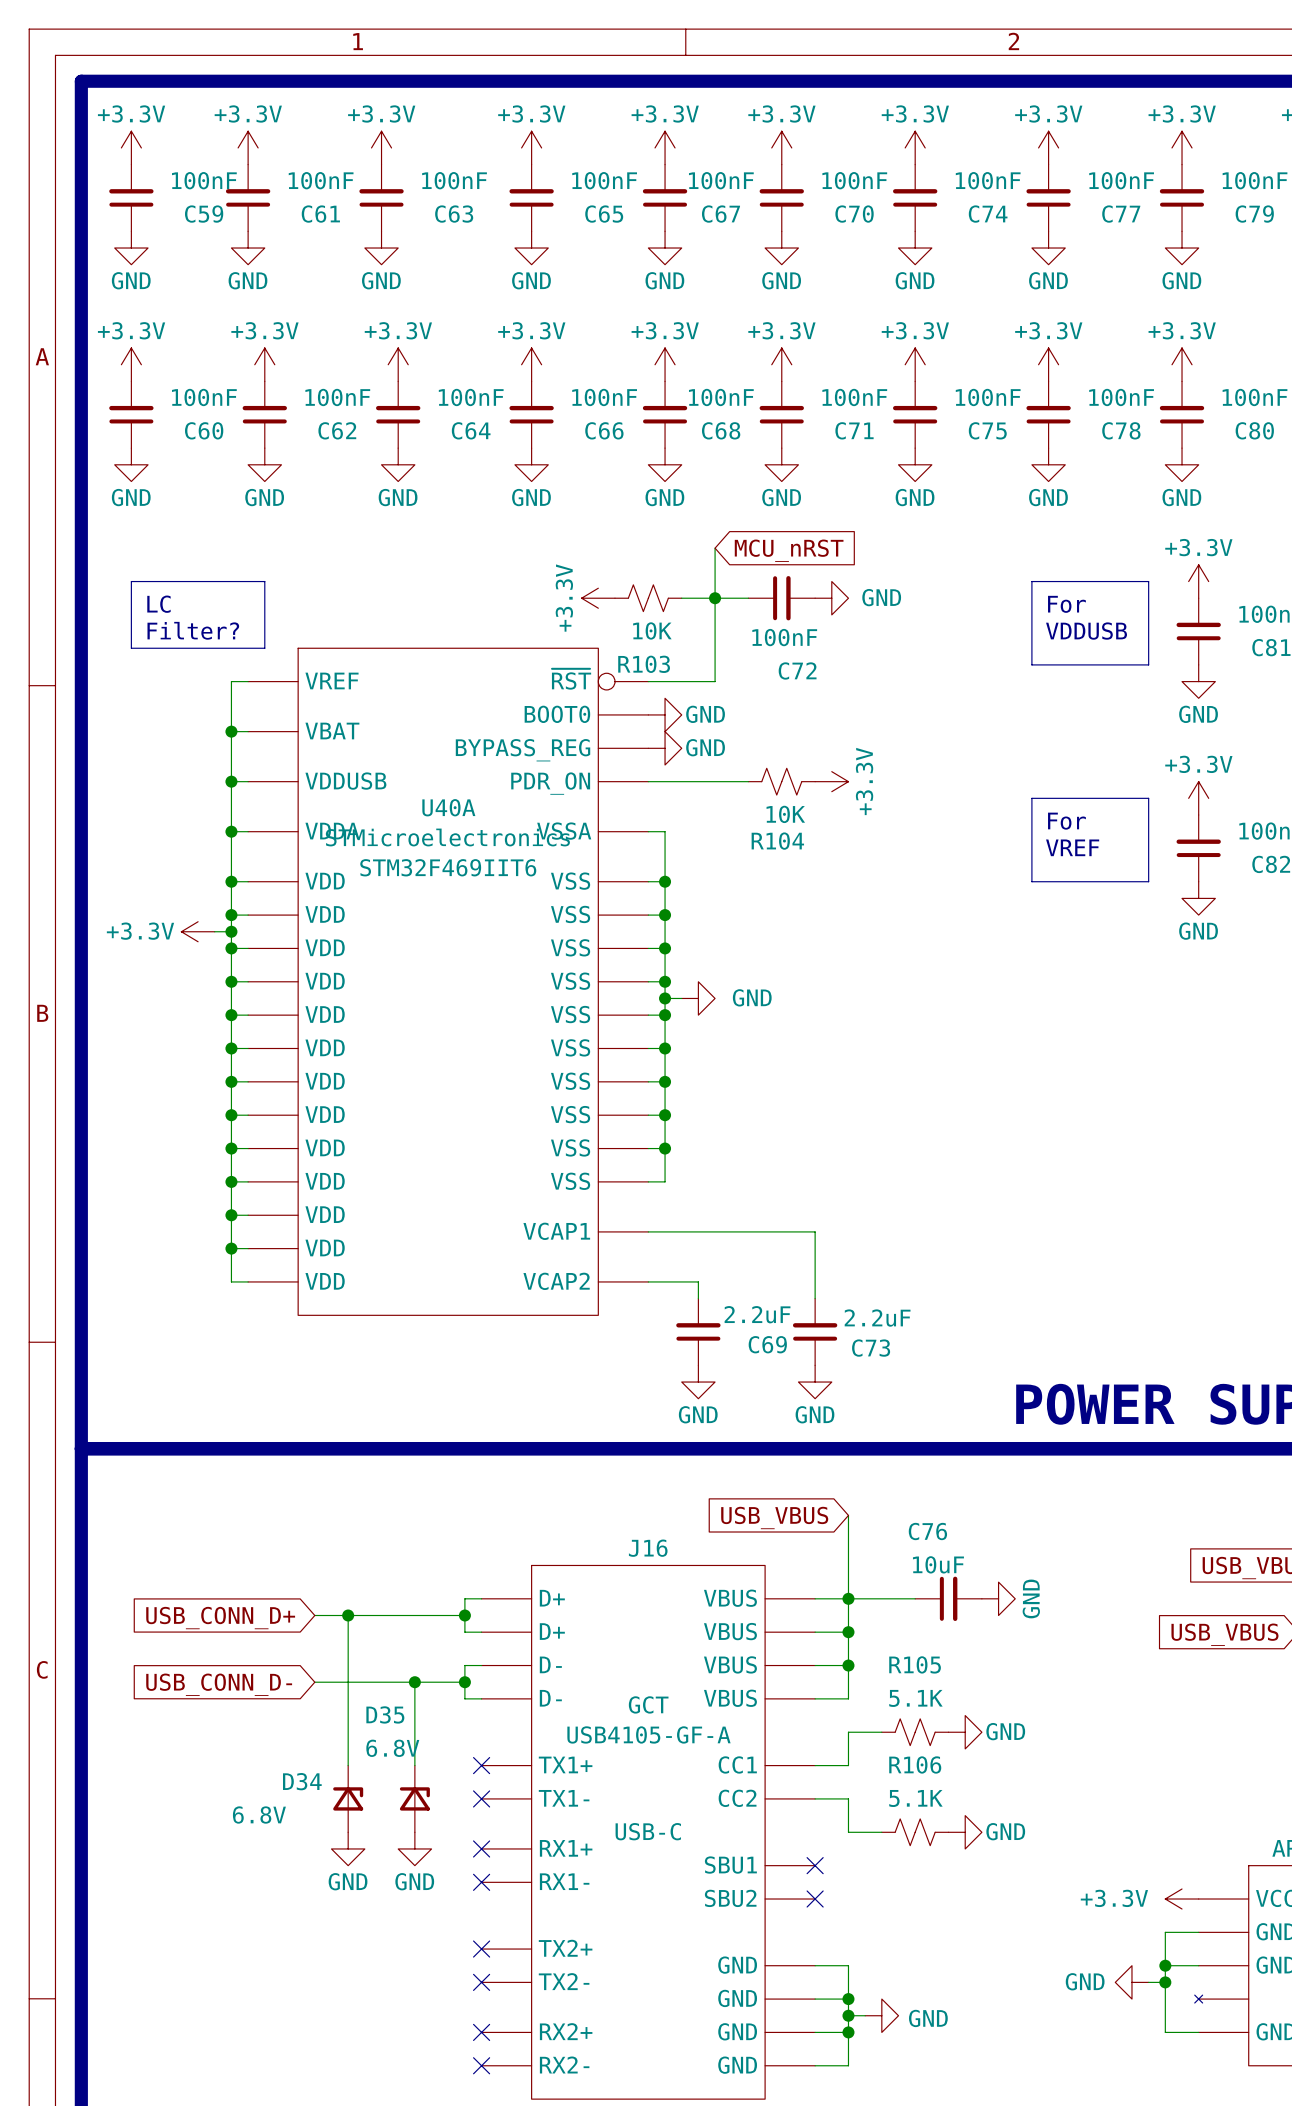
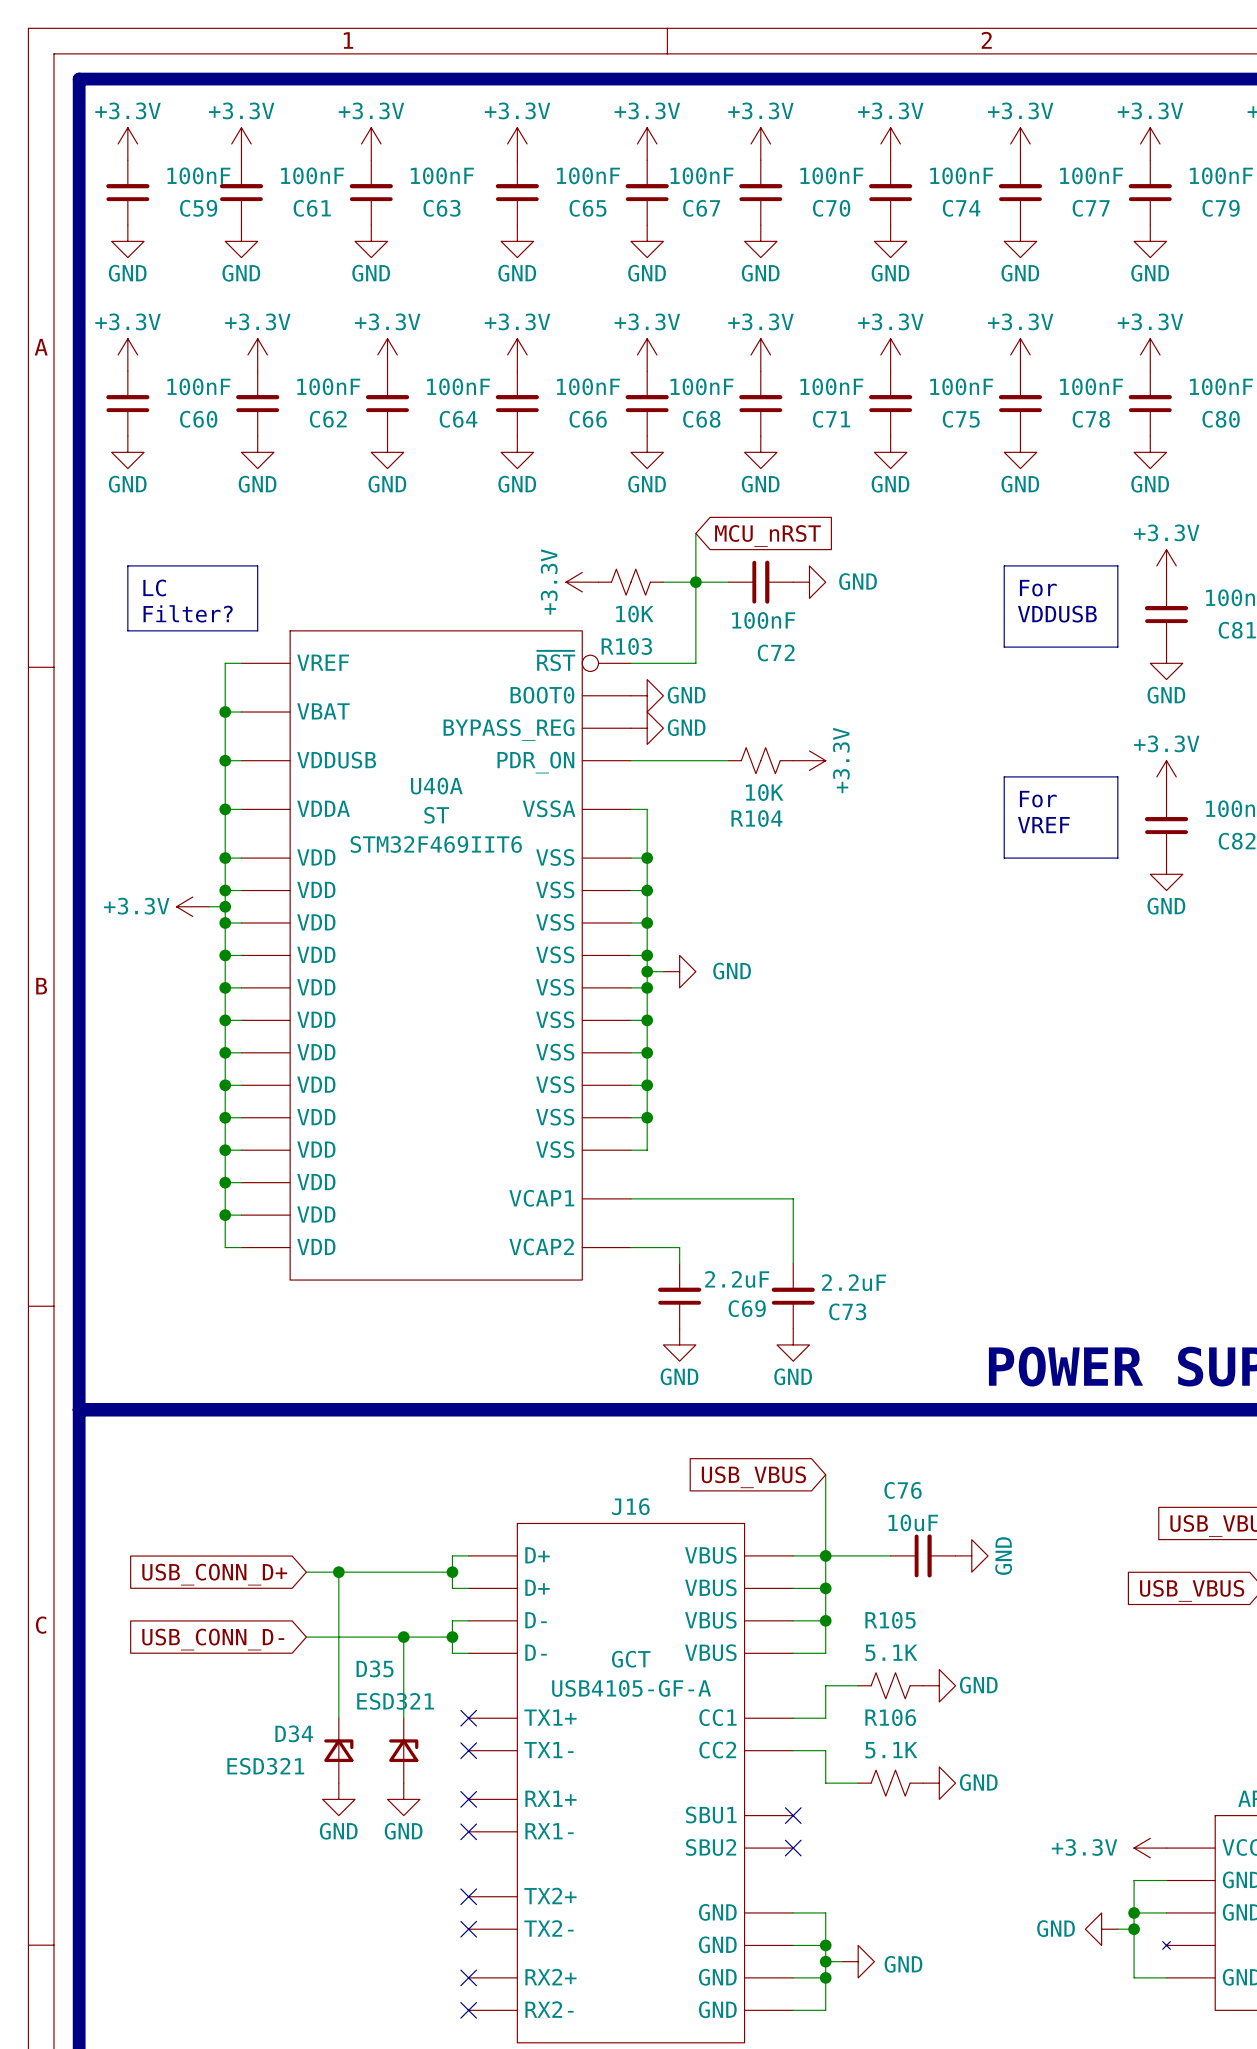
U40A text: STMicroelectronics (447, 837) -> ST (436, 815)
D35 value: 6.8V (392, 1748) -> ESD321 (395, 1701)
D34 value: 6.8V (259, 1815) -> ESD321 (265, 1766)
J16 value: USB-C (648, 1831) -> none

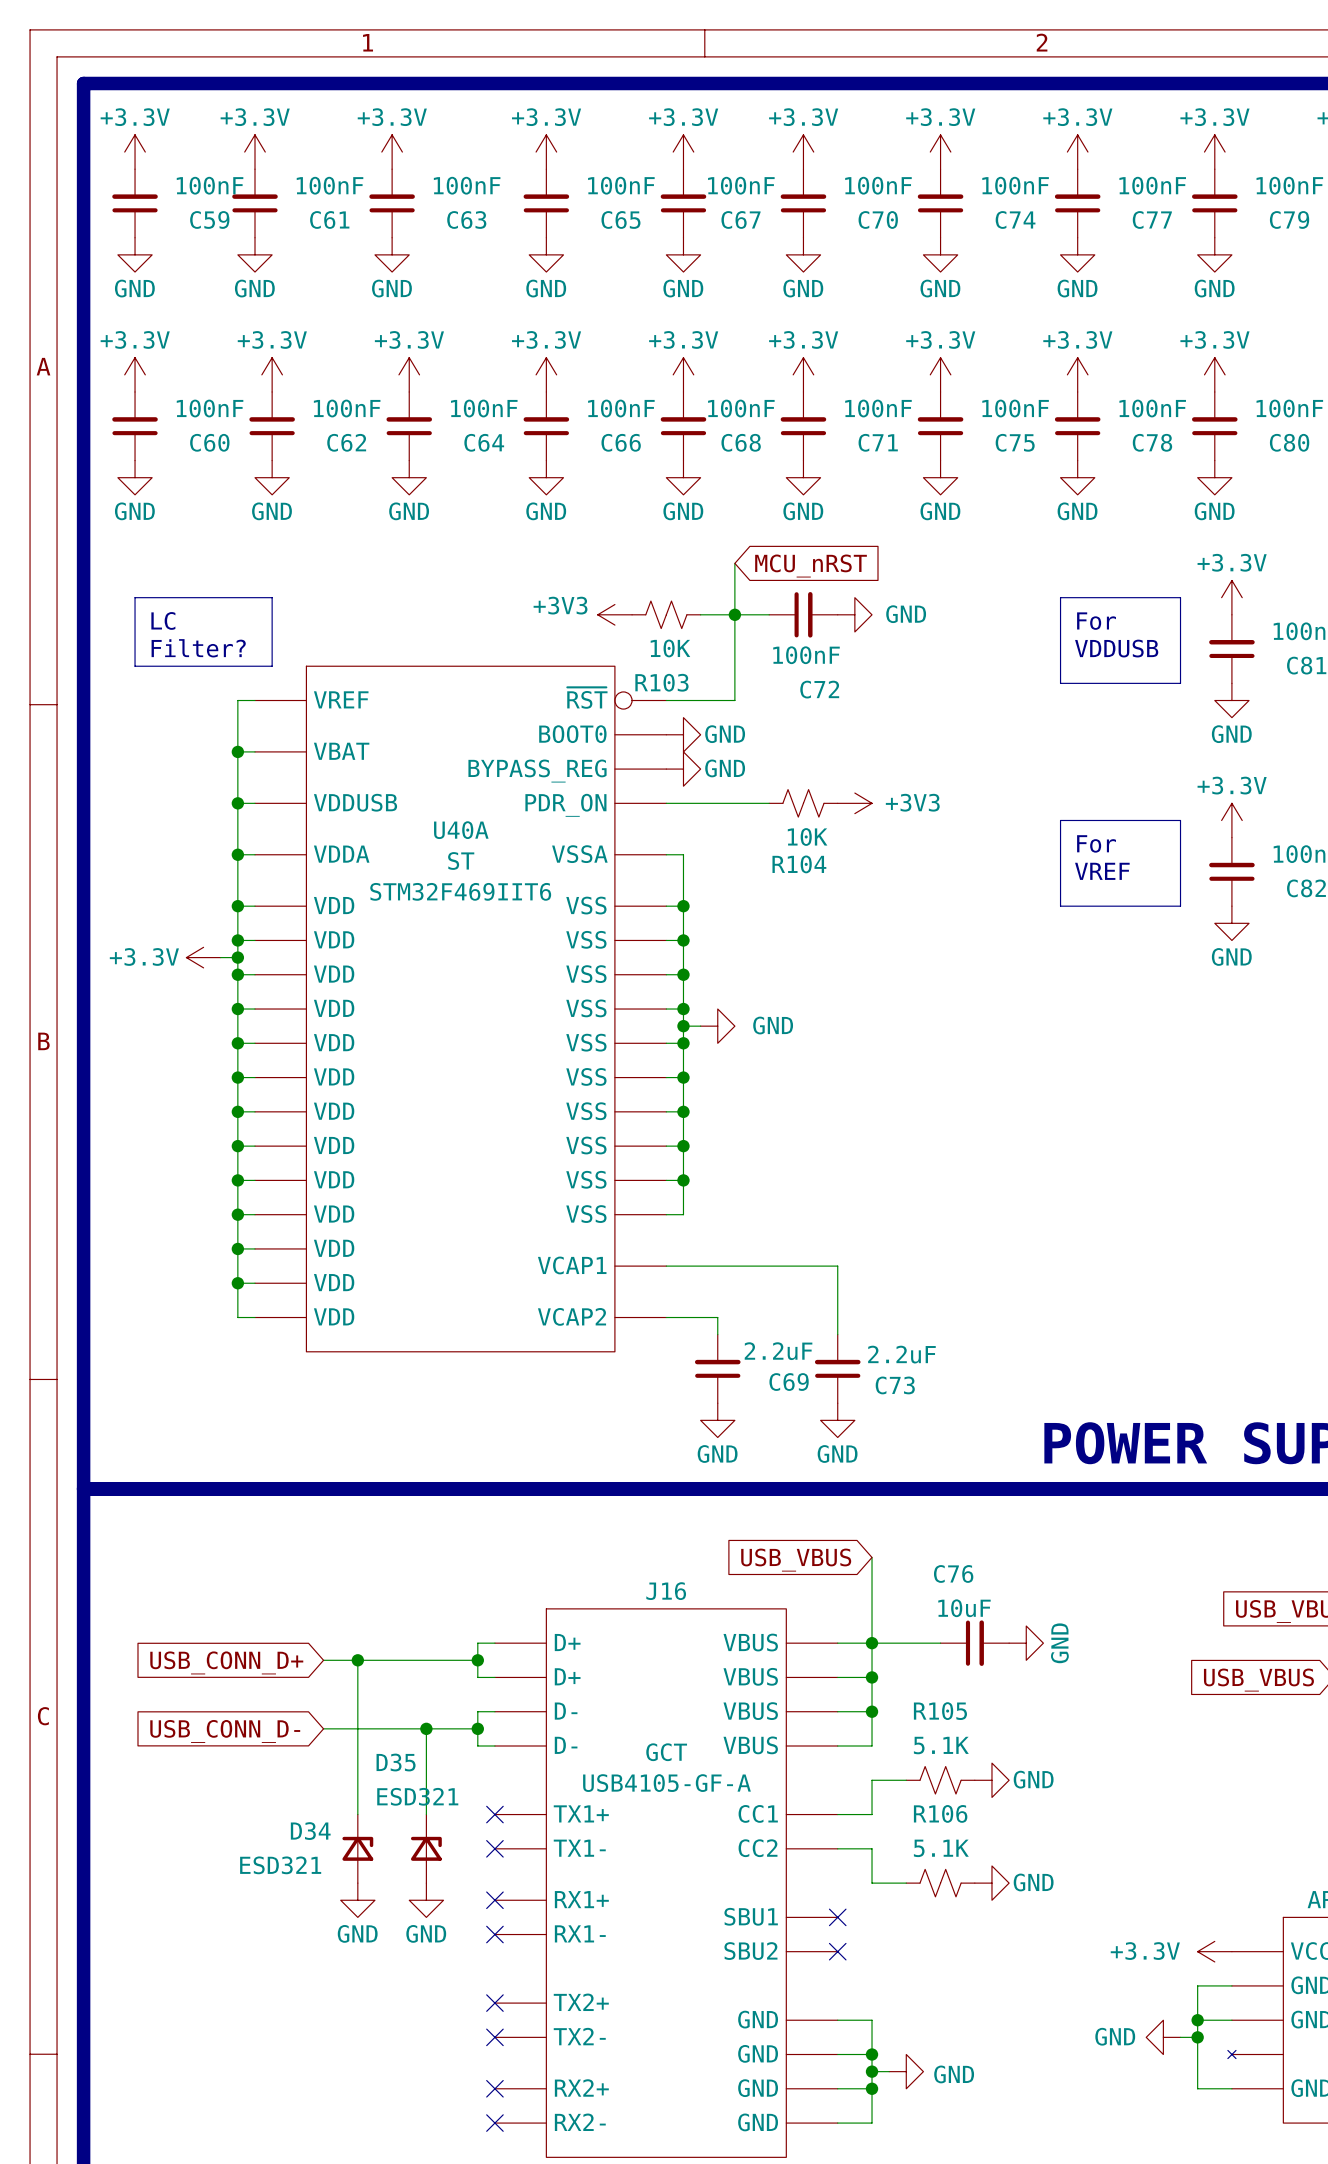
power symbol: +3.3V (582, 582) -> +3V3 (614, 614)
power symbol: +3.3V (809, 760) -> +3V3 (854, 803)

